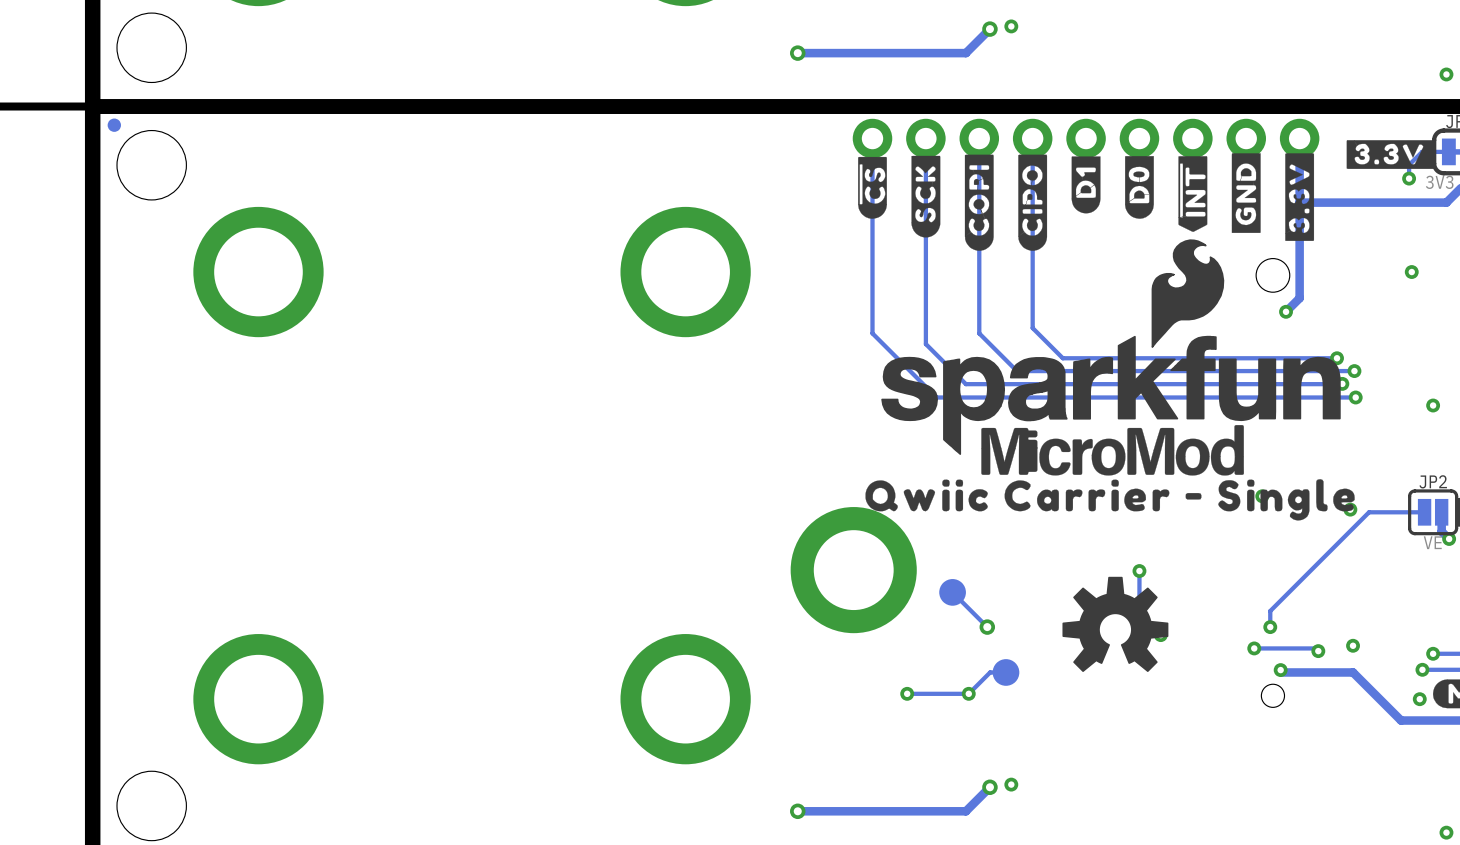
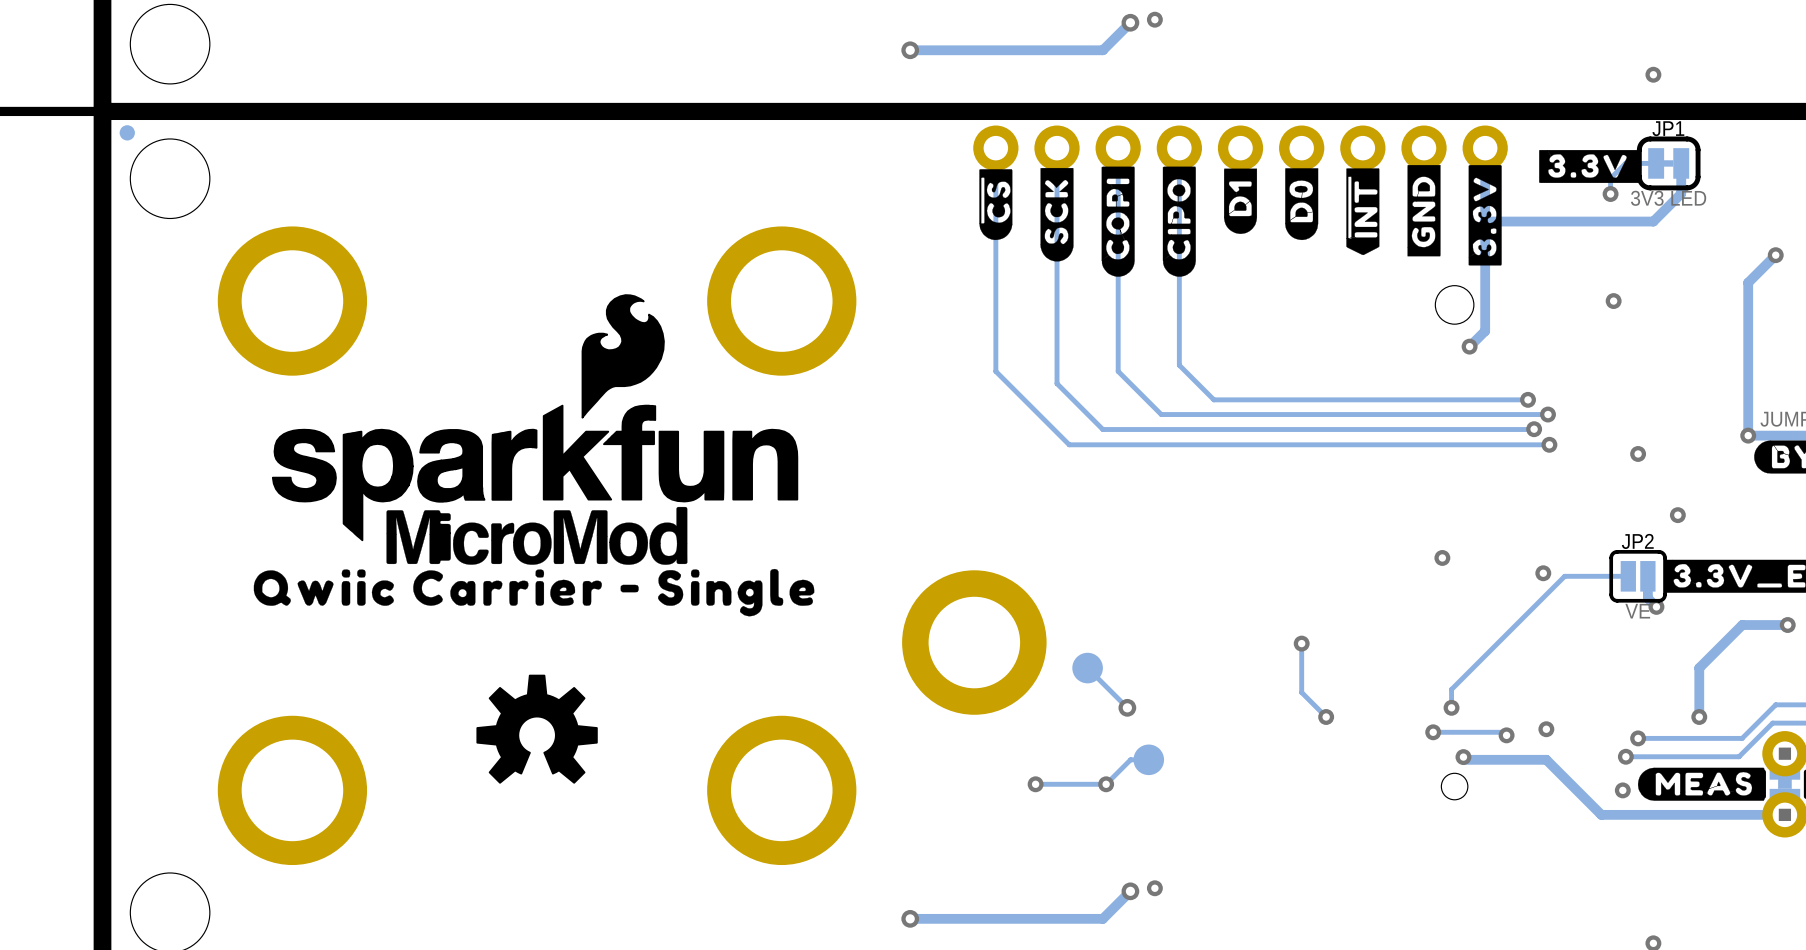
drawing: [865, 239, 1355, 521] -> none
drawing: none -> [253, 294, 815, 617]
drawing: [1062, 576, 1169, 672] -> none
drawing: none -> [476, 674, 598, 784]

